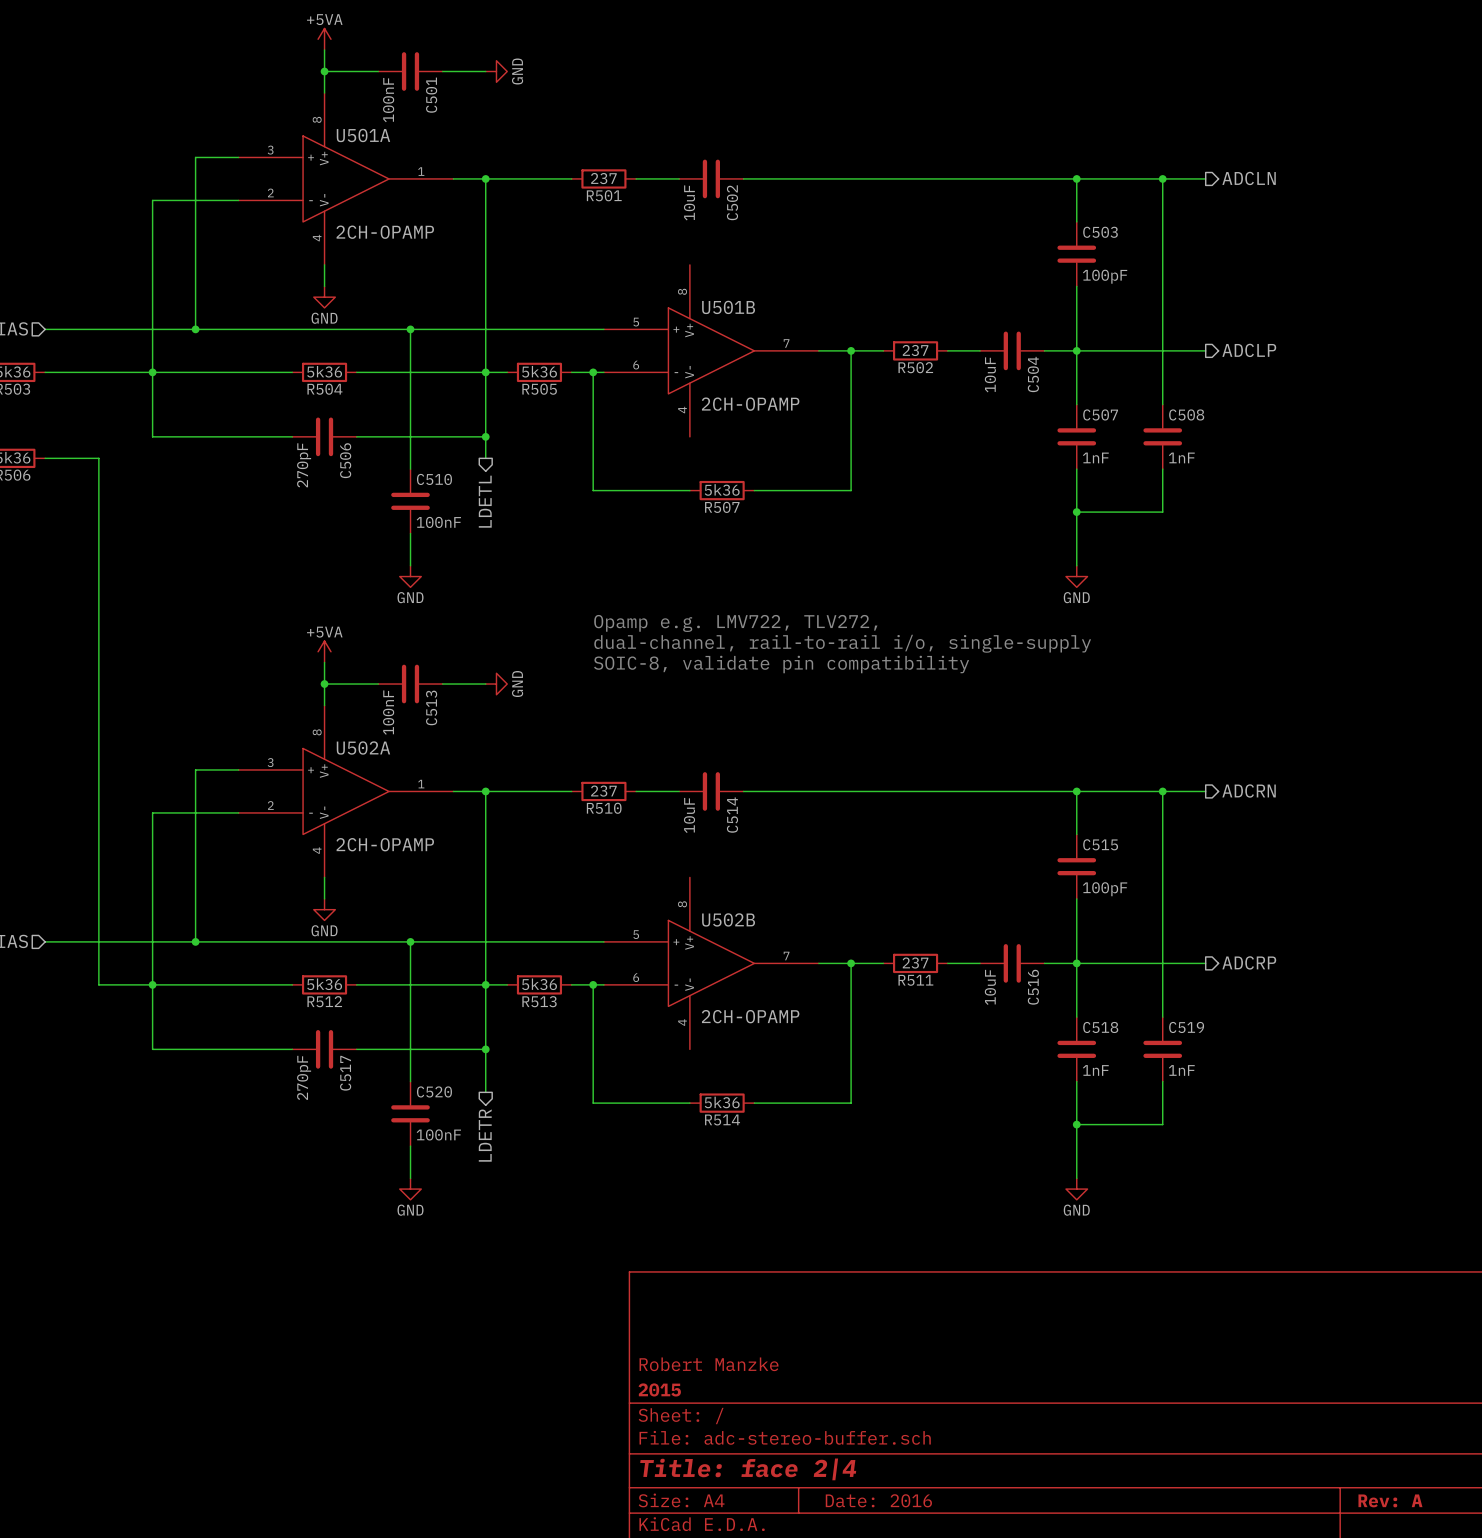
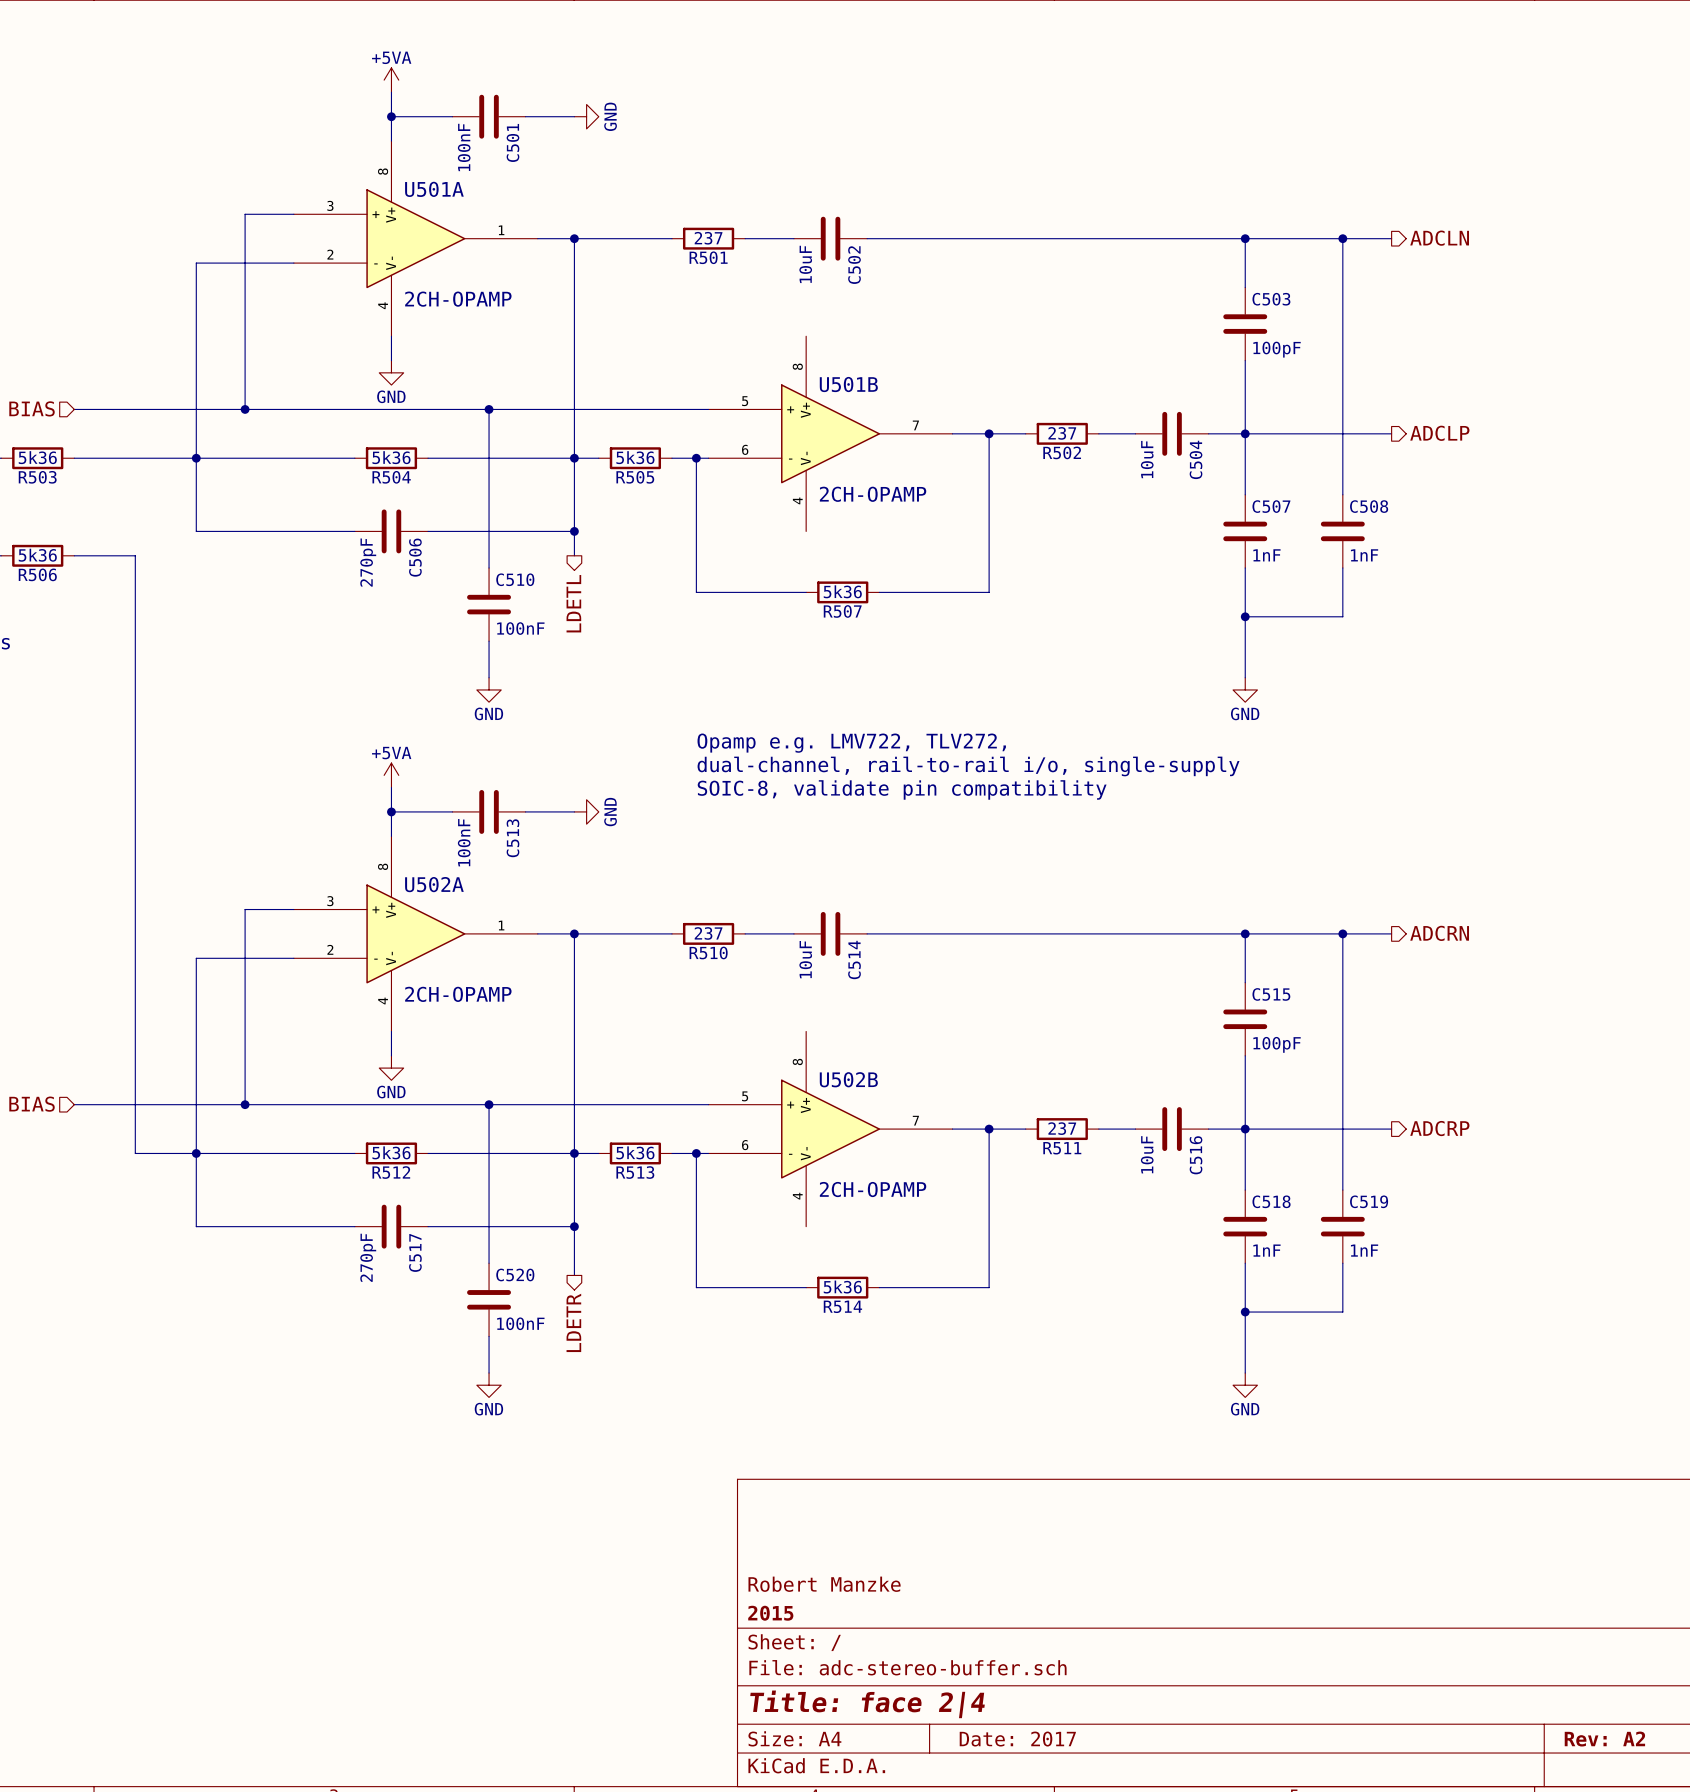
title block: Date: 2016 (878, 1500) -> Date: 2017 (1017, 1739)
title block: Rev: A (1390, 1500) -> Rev: A2 (1604, 1739)

